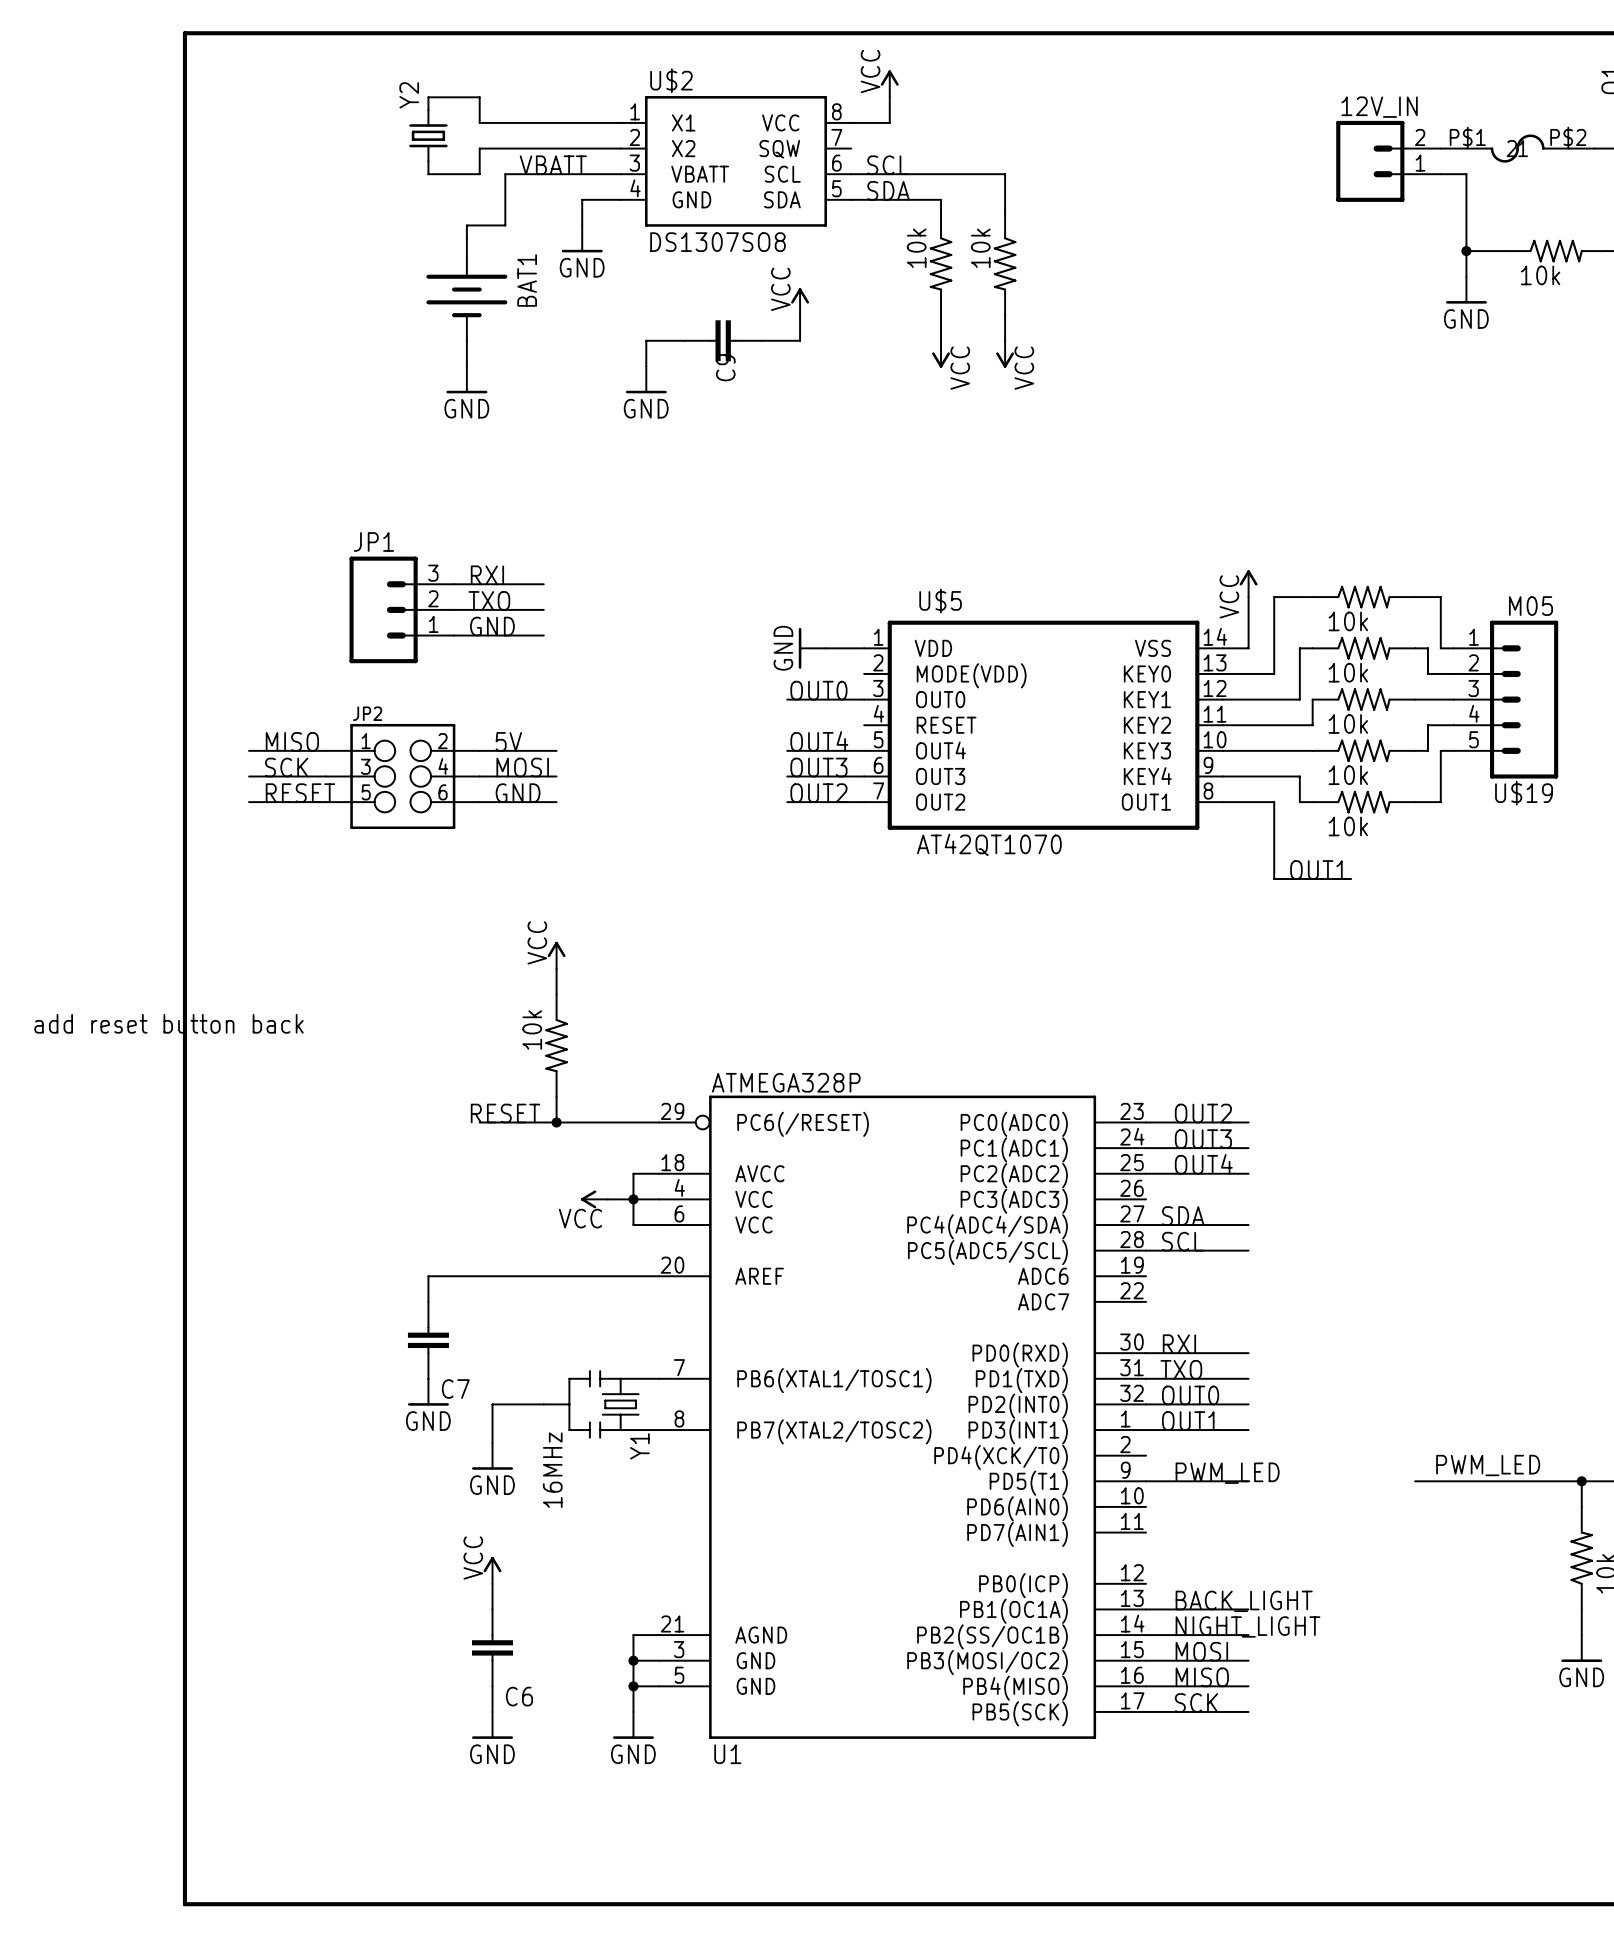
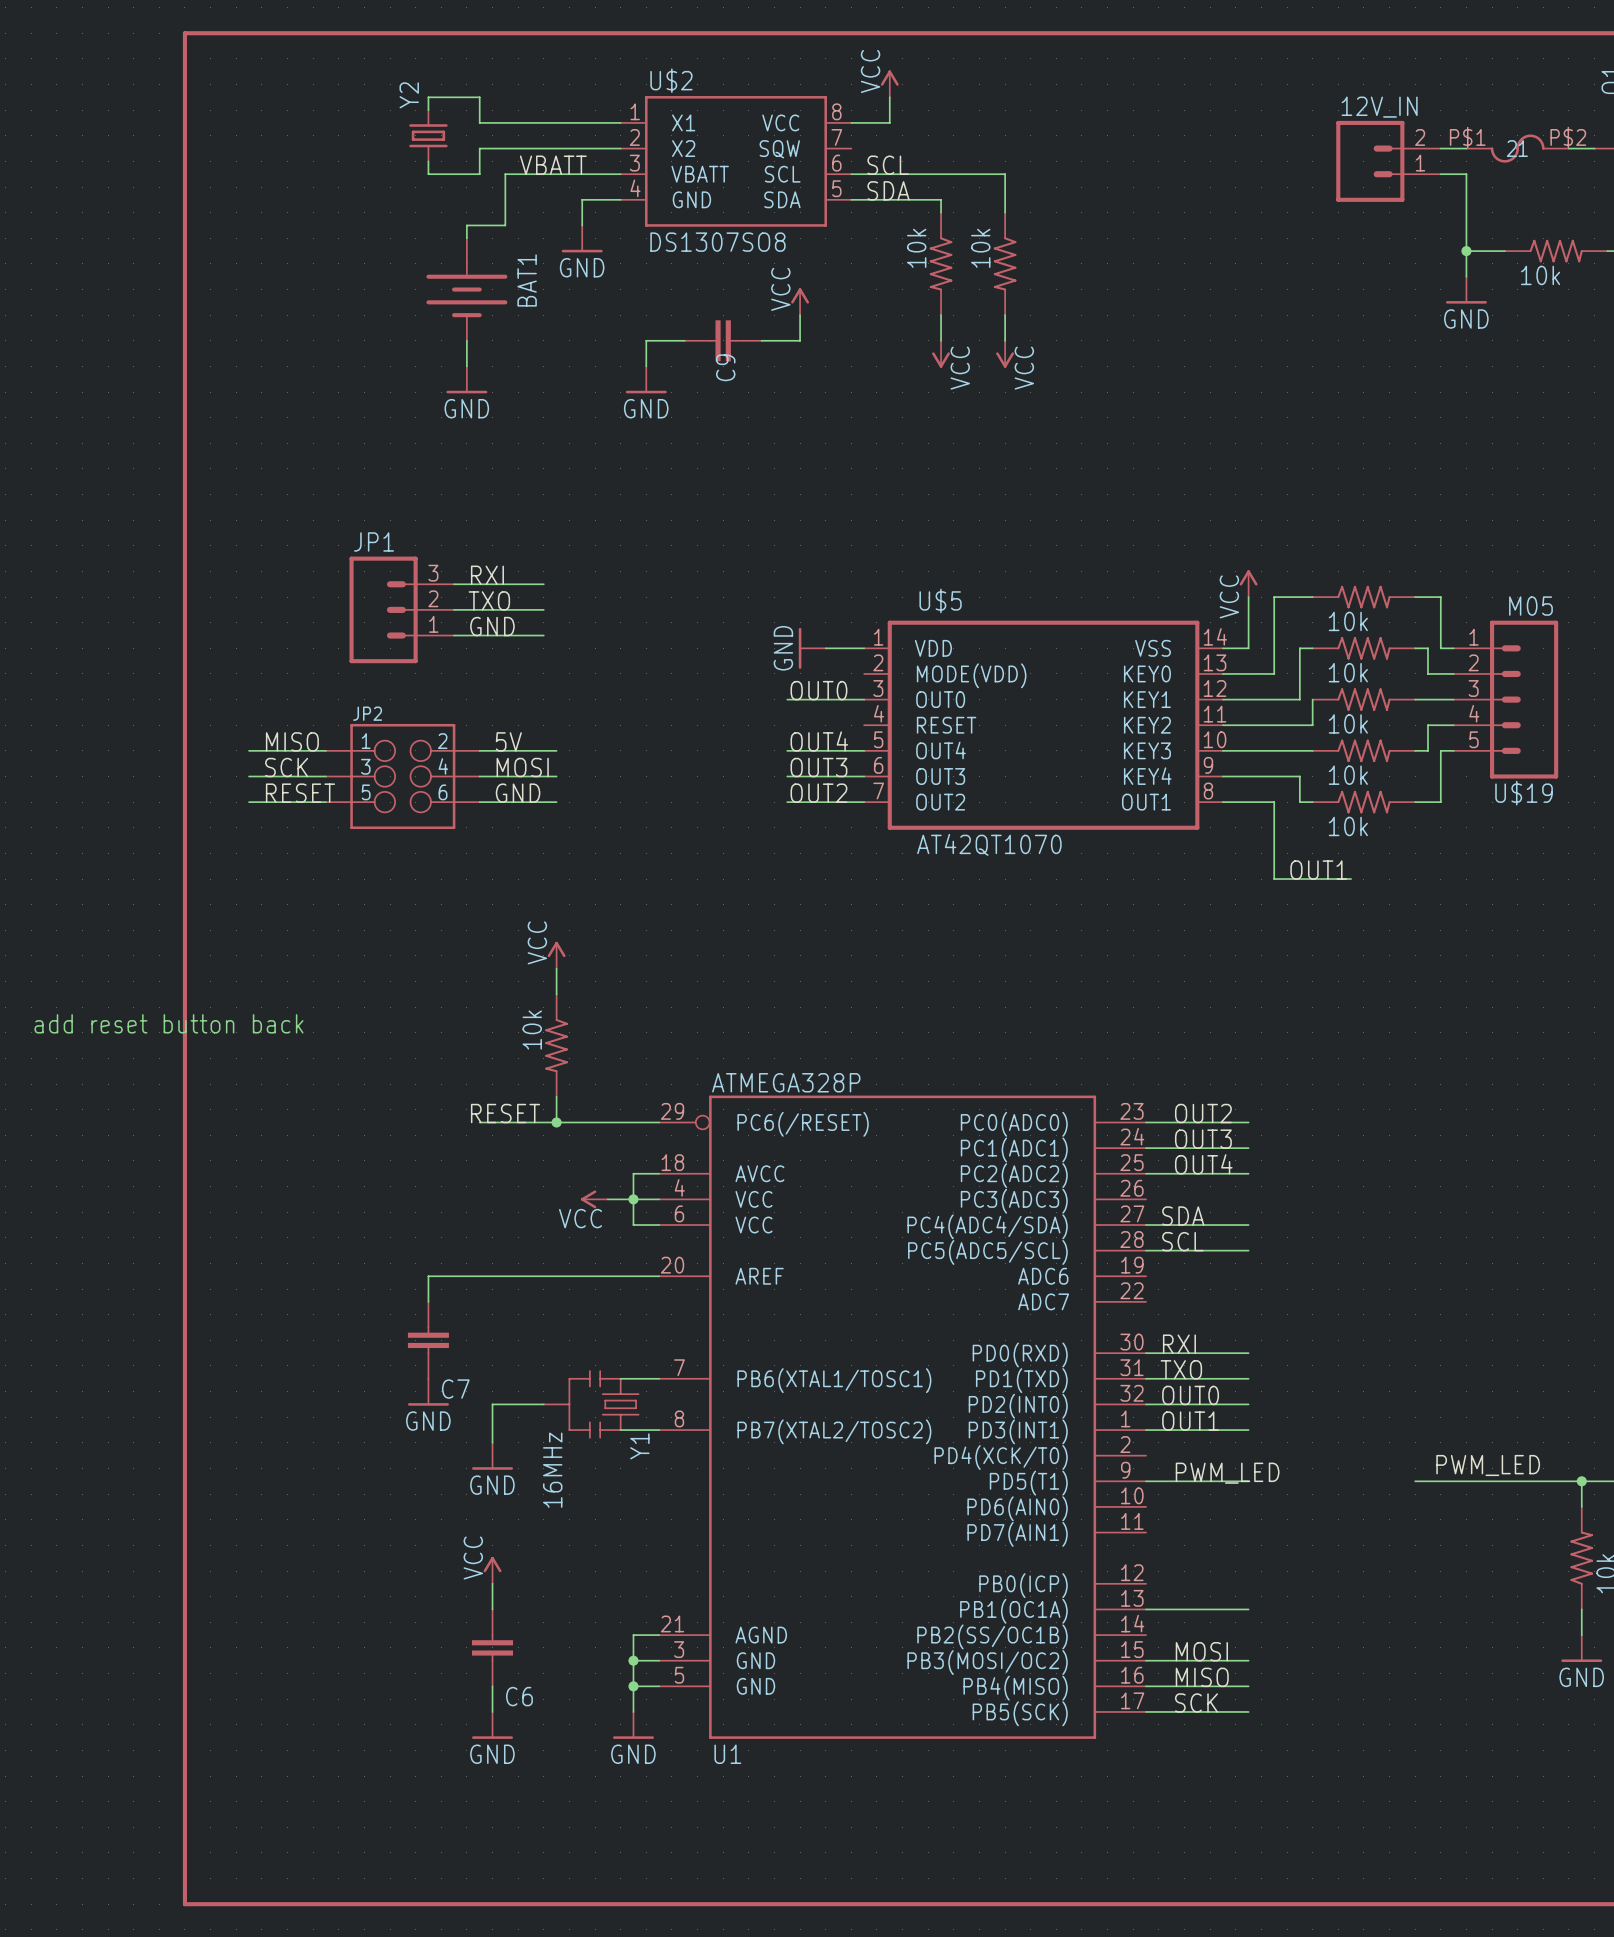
label: BACK_LIGHT (1244, 1601) -> none
label: NIGHT_LIGHT (1247, 1626) -> none
wire: (1146, 1635) (1248, 1635) -> none

